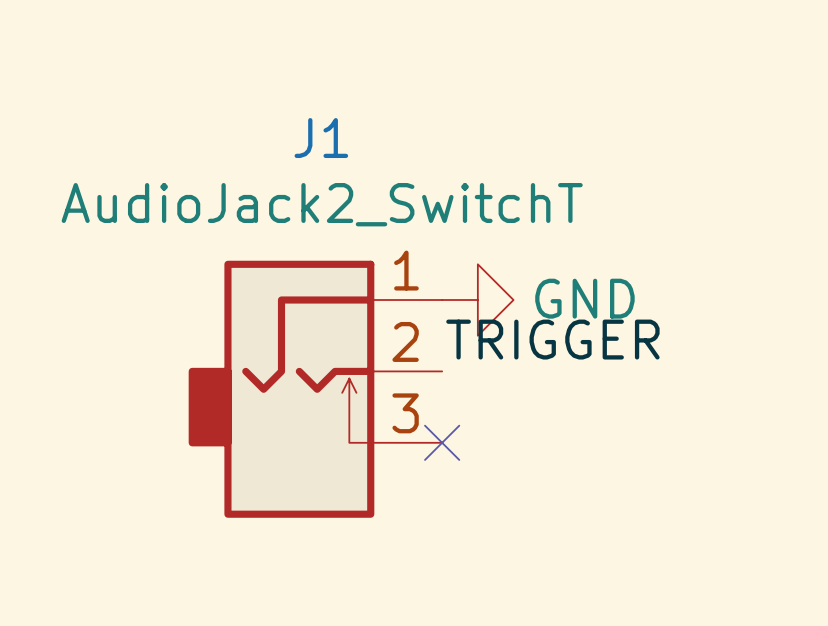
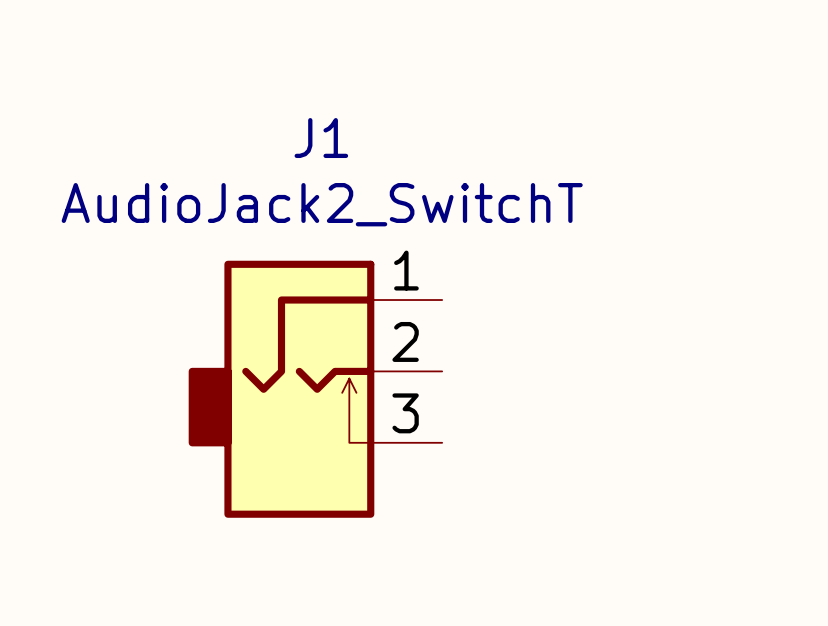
power symbol: GND (477, 300) -> none
label: TRIGGER (552, 339) -> none
no-connect mark: (442, 442) -> none

